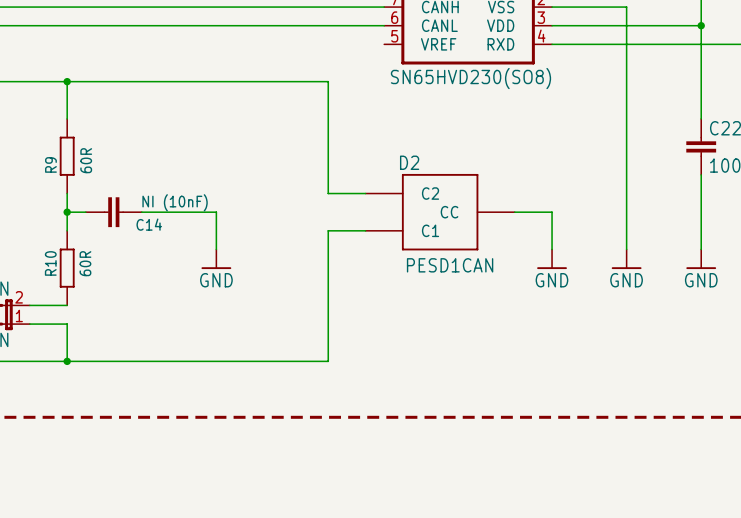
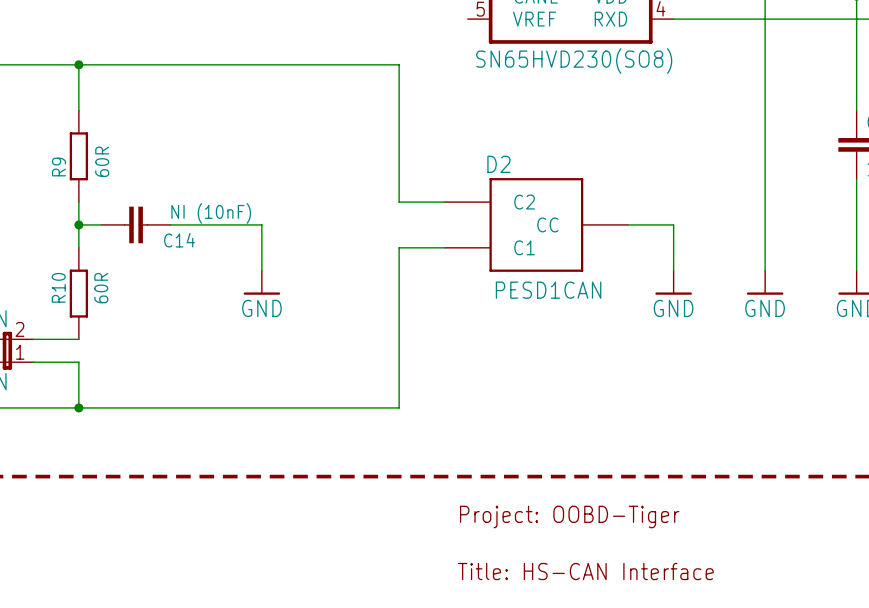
text: none -> Project: OOBD-Tiger (569, 516)
text: none -> Title: HS-CAN Interface (585, 571)

